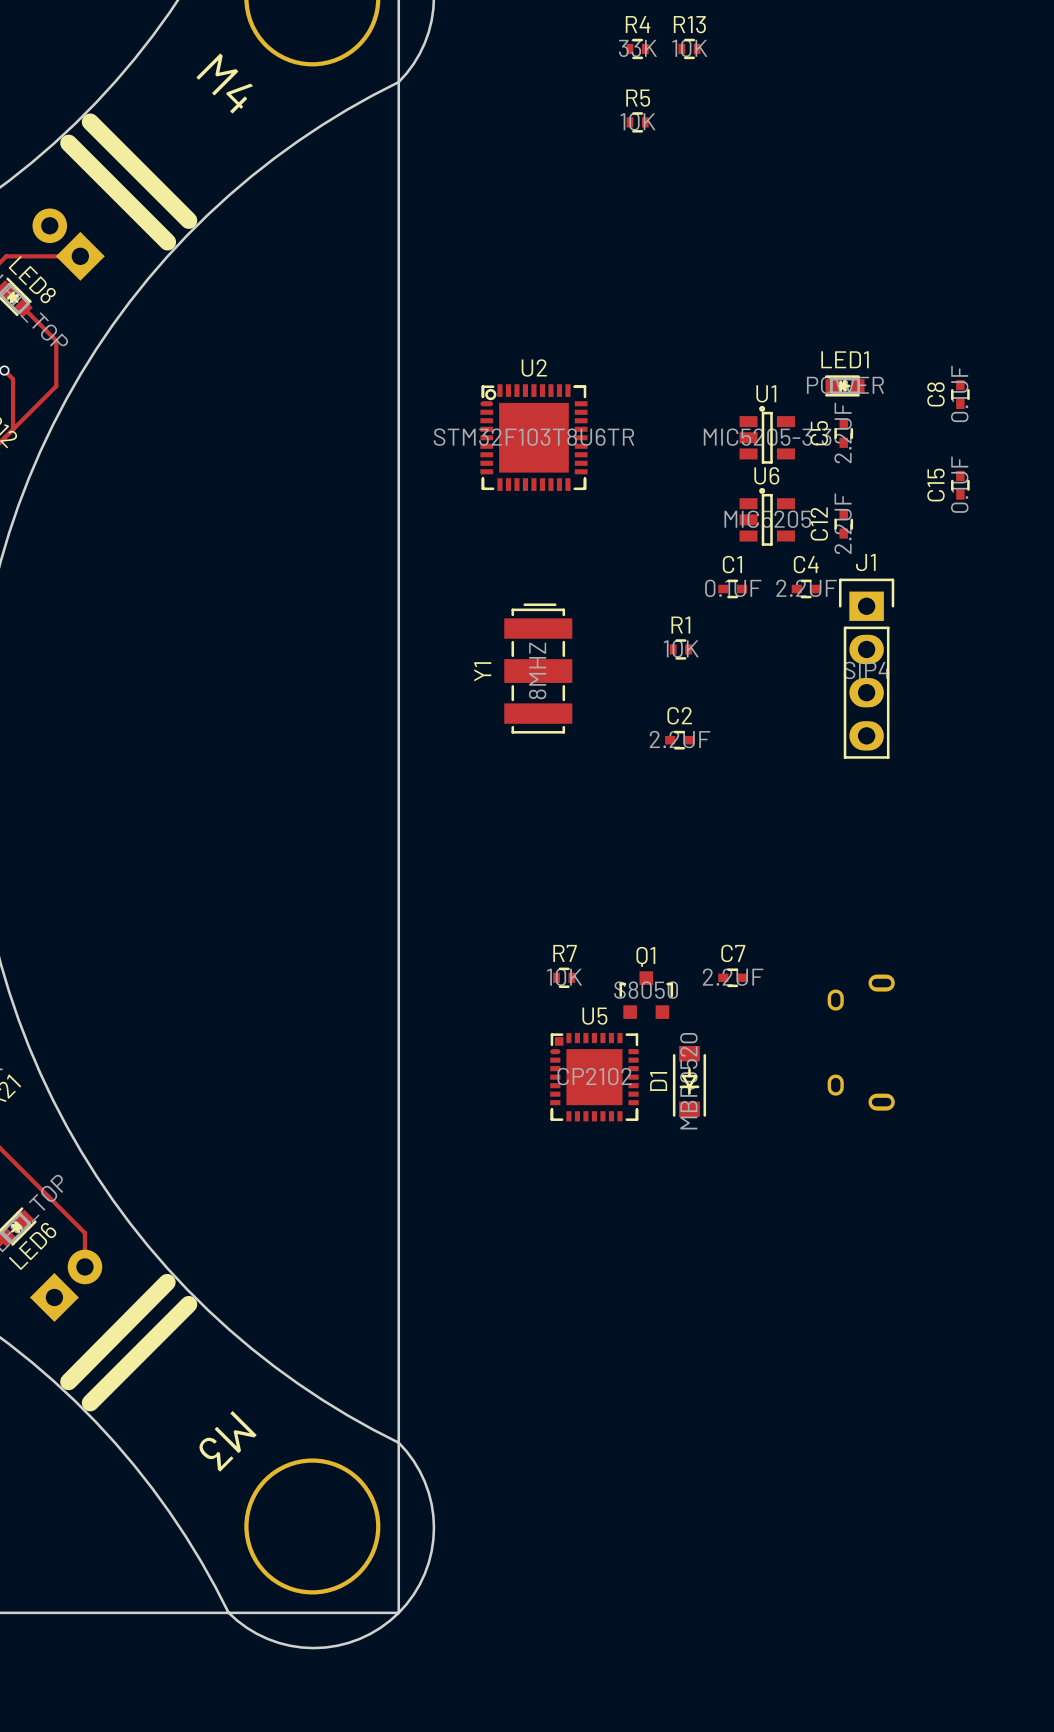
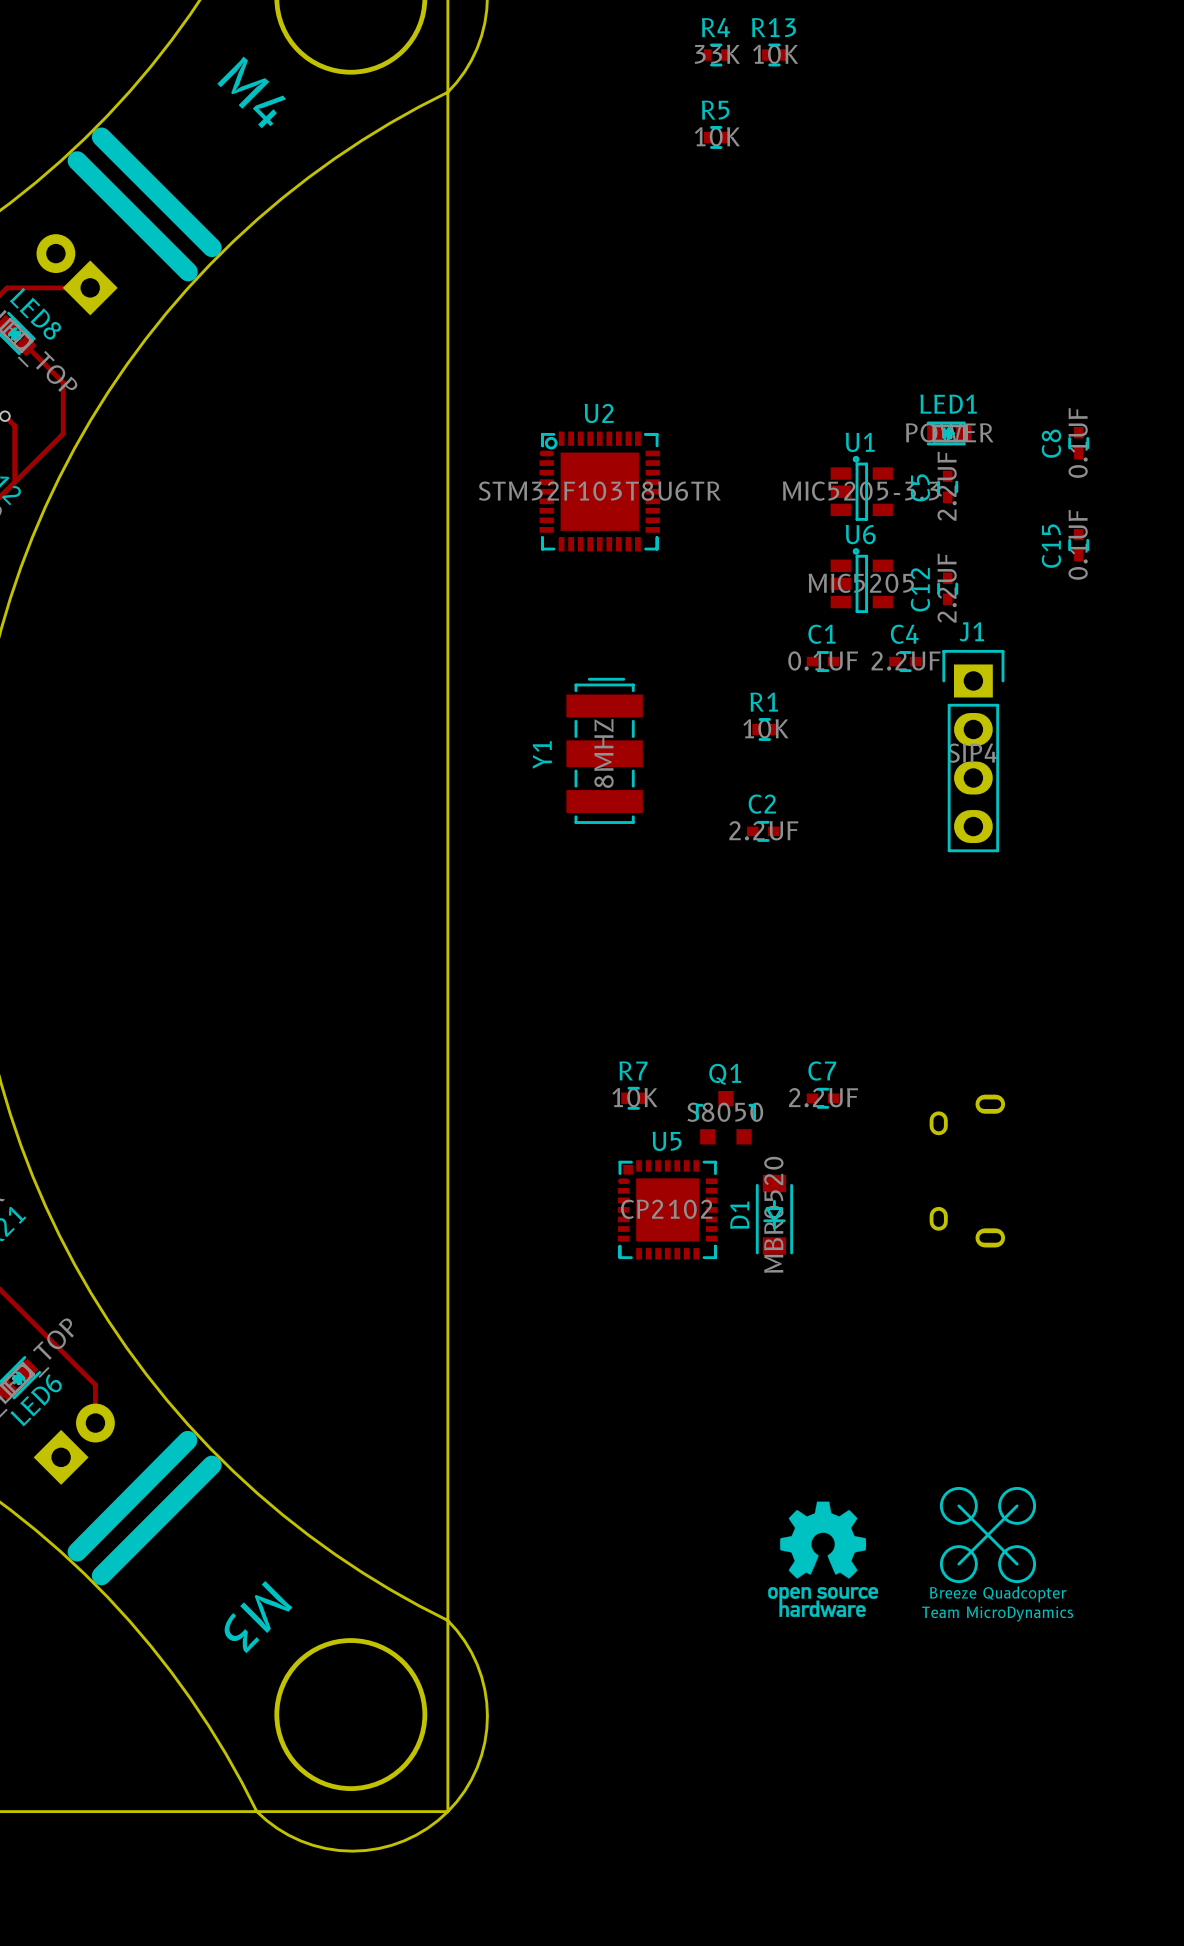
drawing: none -> [768, 1486, 1037, 1618]

